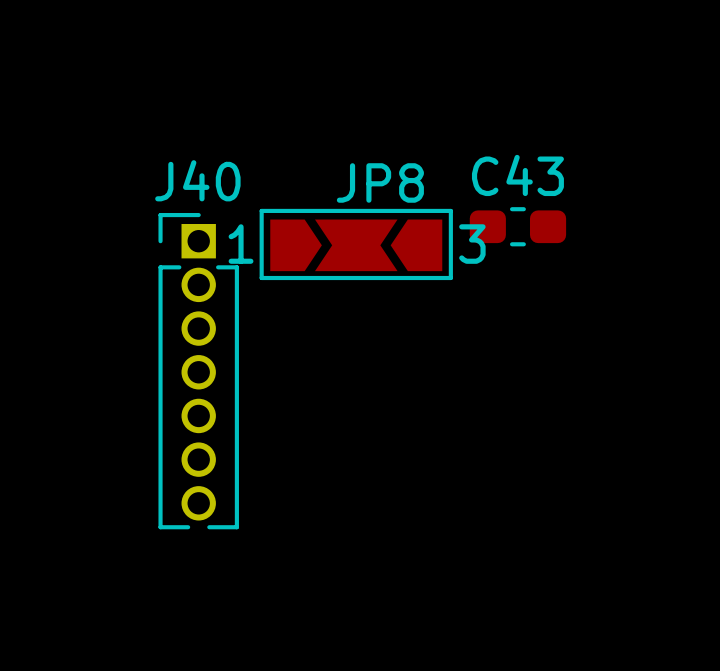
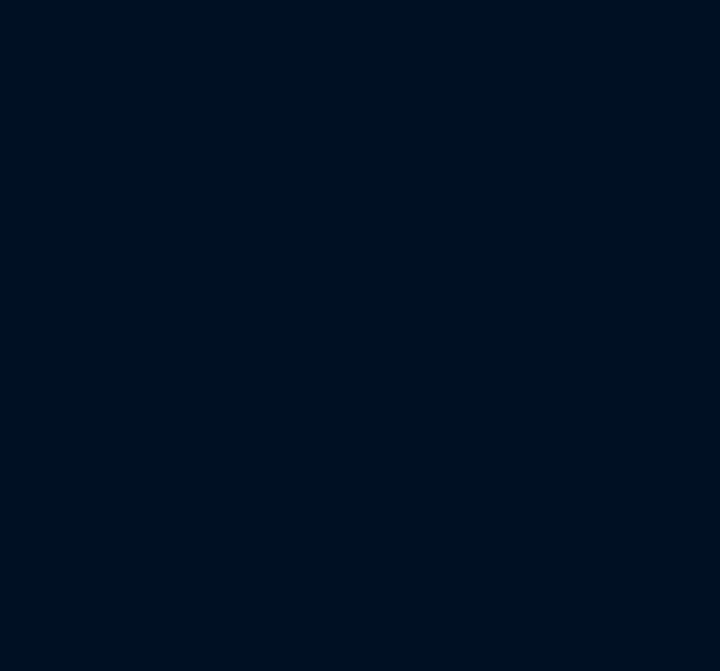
C43: (517, 226) -> none
JP8: (356, 244) -> none
J40: (198, 371) -> none

